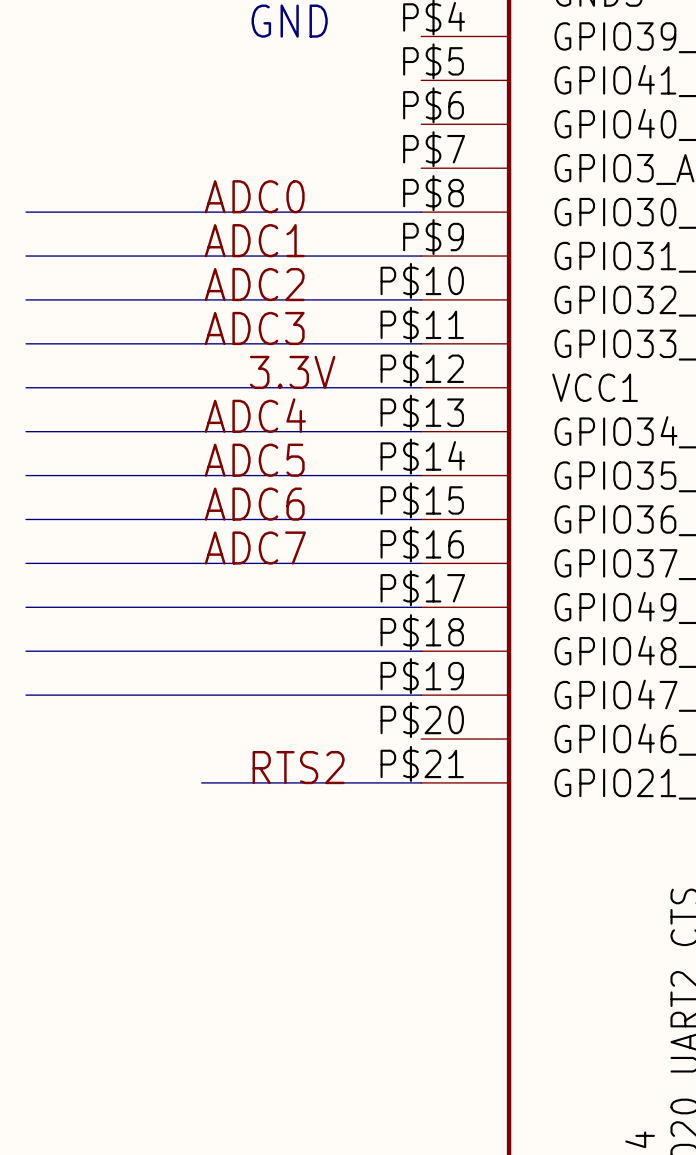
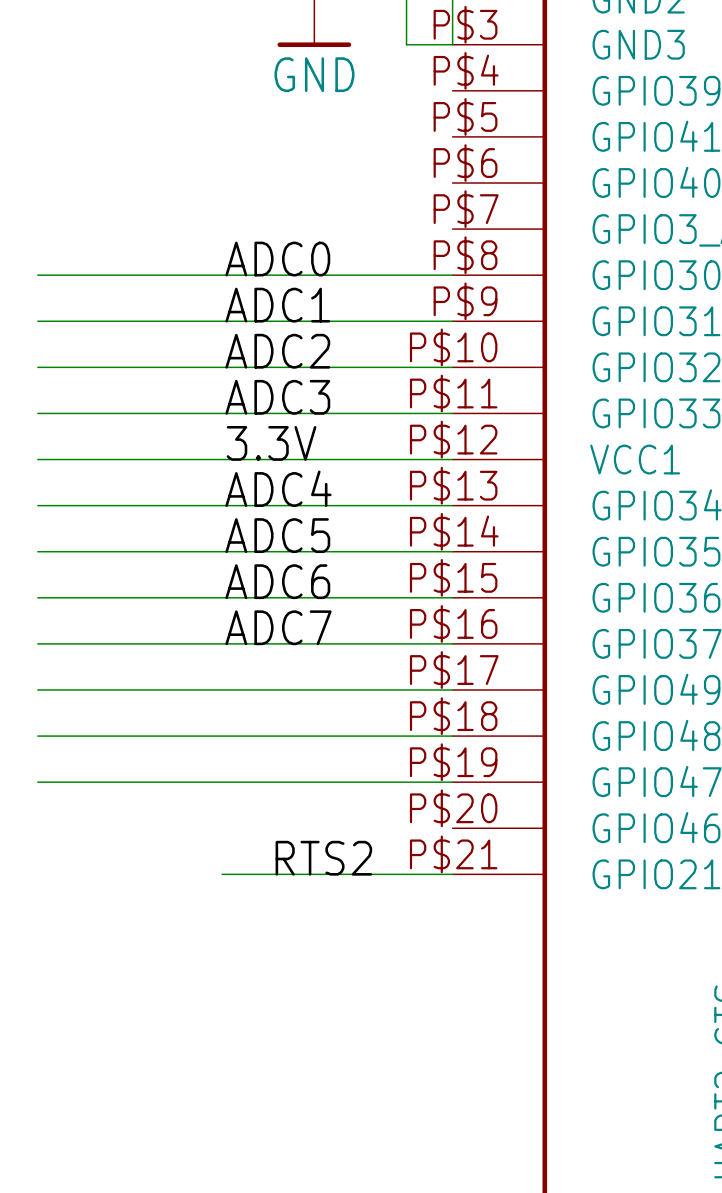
label position: 3.3V (292, 372) -> 3.3V (271, 443)

